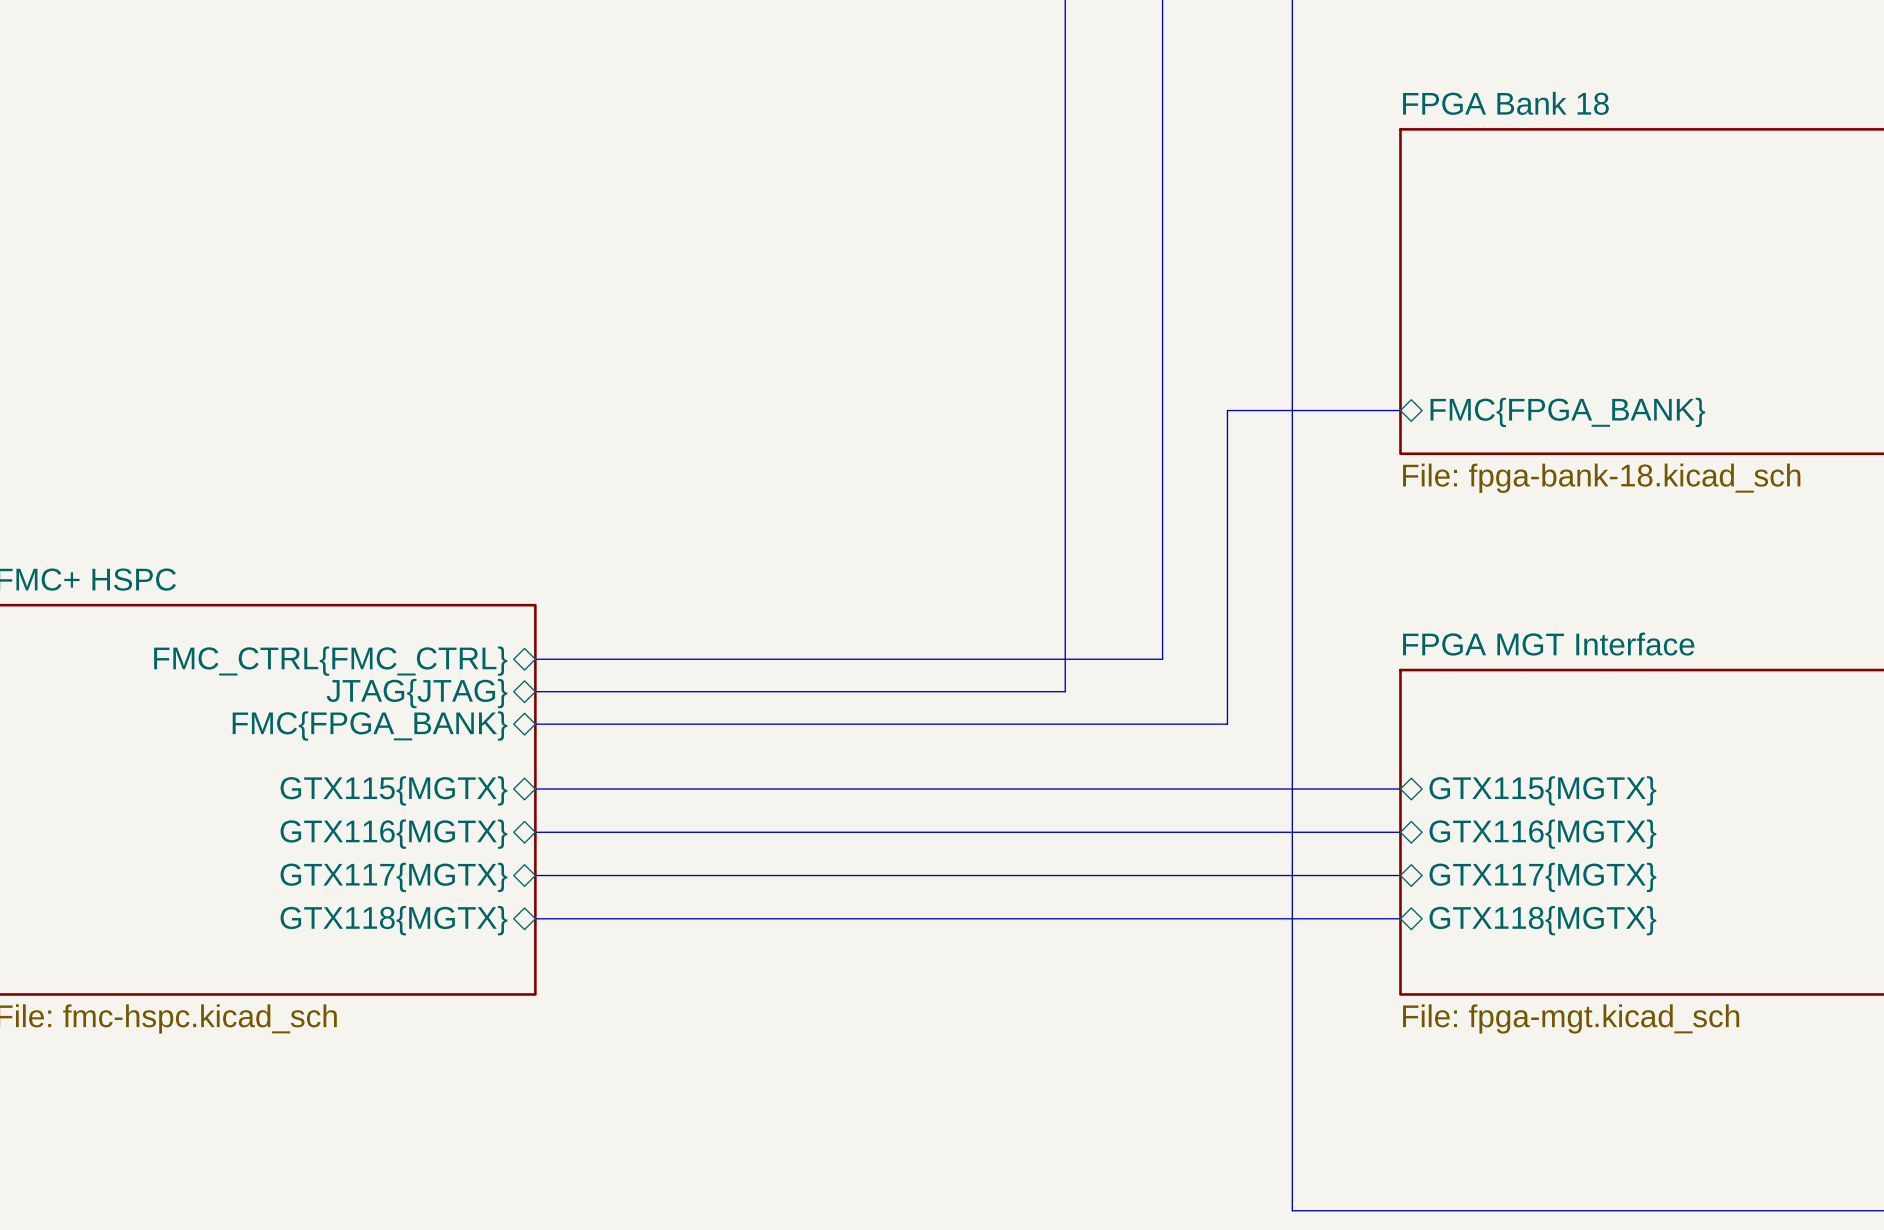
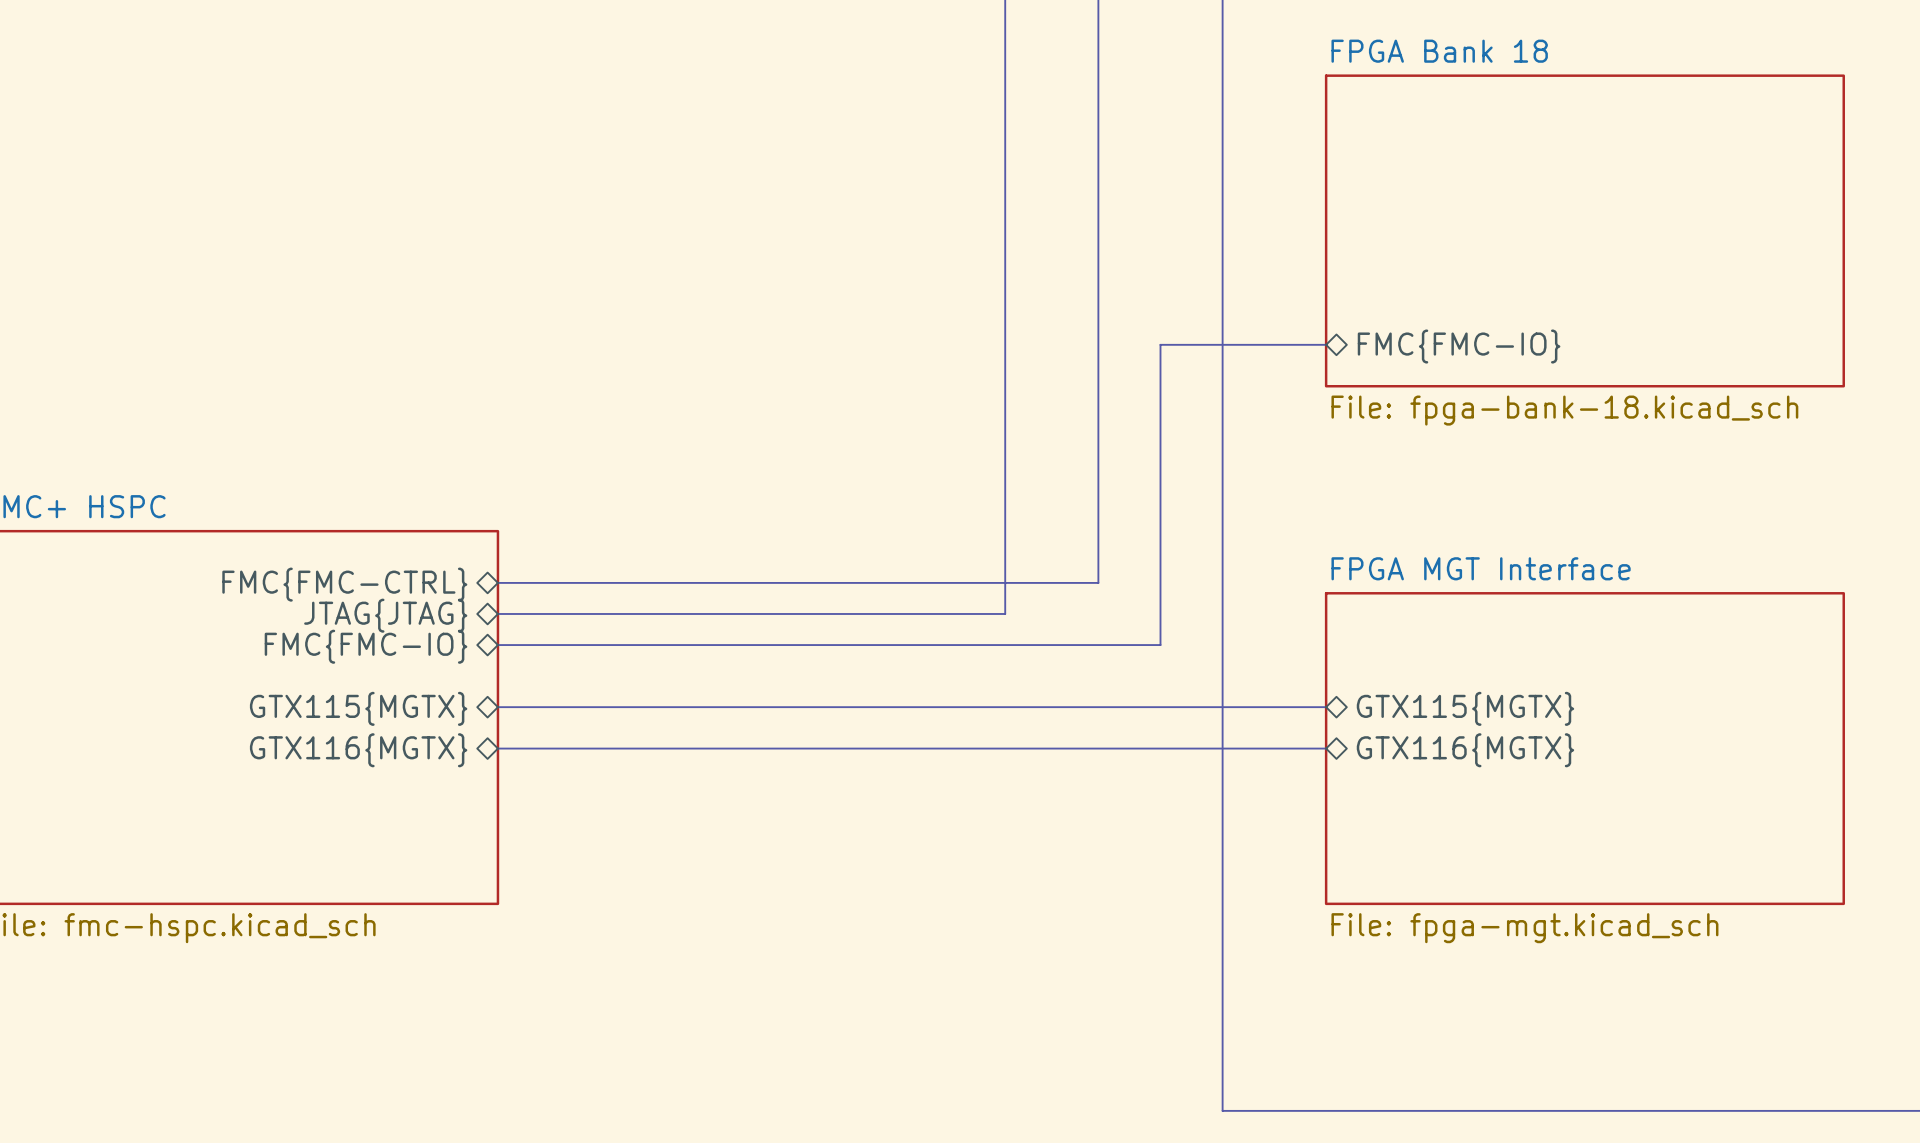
sheet pin: FMC{FPGA_BANK} (1567, 412) -> FMC{FMC-IO} (1459, 346)
sheet pin: FMC_CTRL{FMC_CTRL} (330, 661) -> FMC{FMC-CTRL} (344, 584)
sheet pin: FMC{FPGA_BANK} (370, 726) -> FMC{FMC-IO} (366, 646)
bus: (535, 875) (1400, 875) -> none
sheet pin: GTX117{MGTX} (393, 877) -> none
sheet pin: GTX117{MGTX} (1542, 877) -> none
bus: (535, 918) (1400, 918) -> none
sheet pin: GTX118{MGTX} (393, 920) -> none
sheet pin: GTX118{MGTX} (1542, 920) -> none

